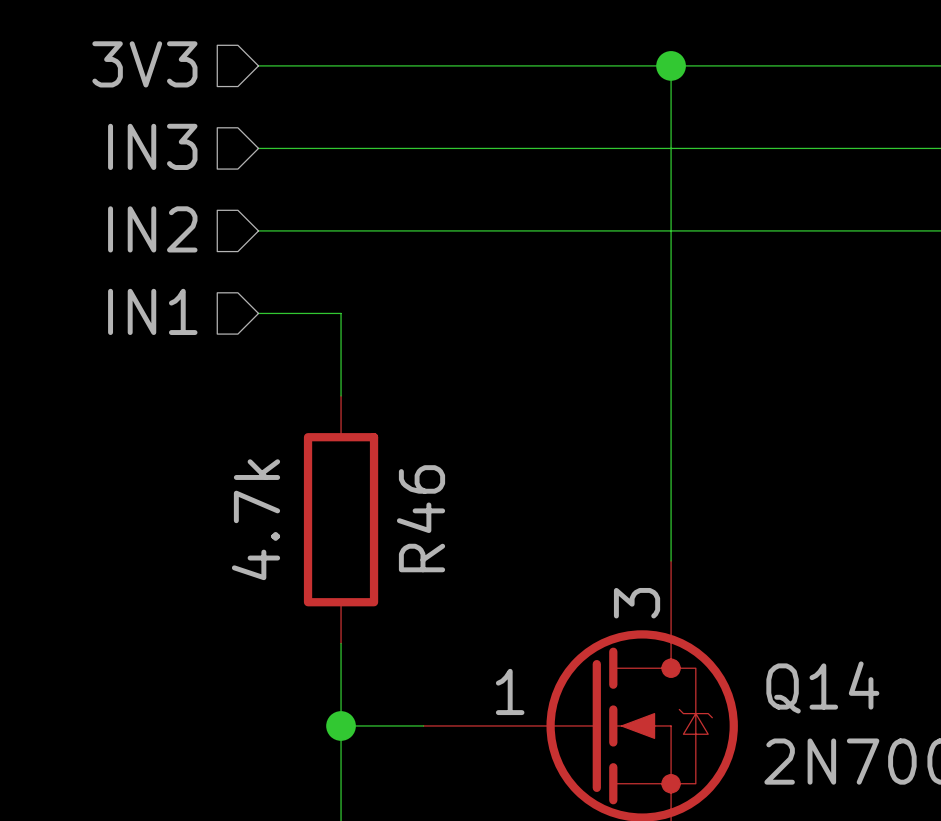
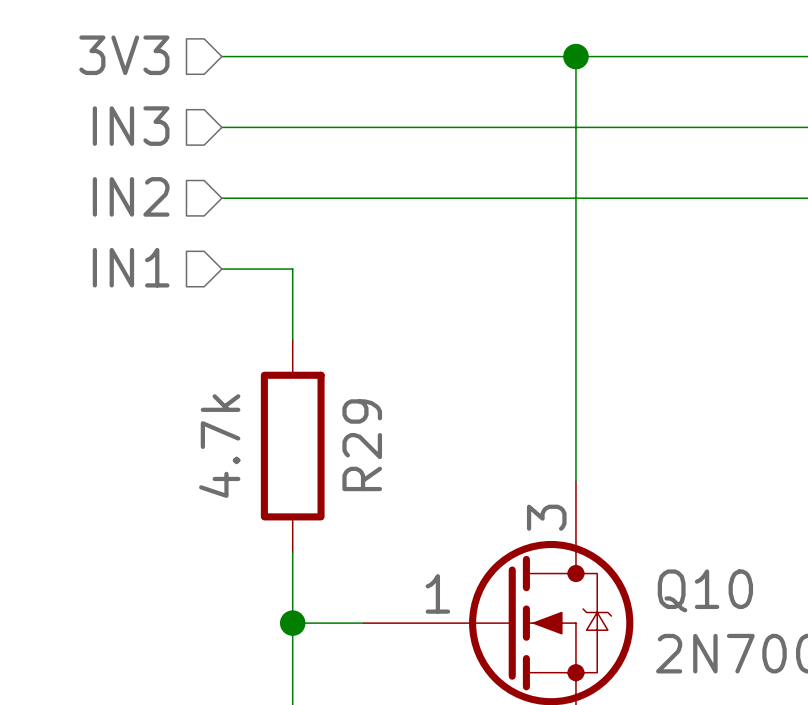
R46 name: R46 (421, 518) -> R29 (362, 445)
Q14 name: Q14 (822, 687) -> Q10 (705, 590)

